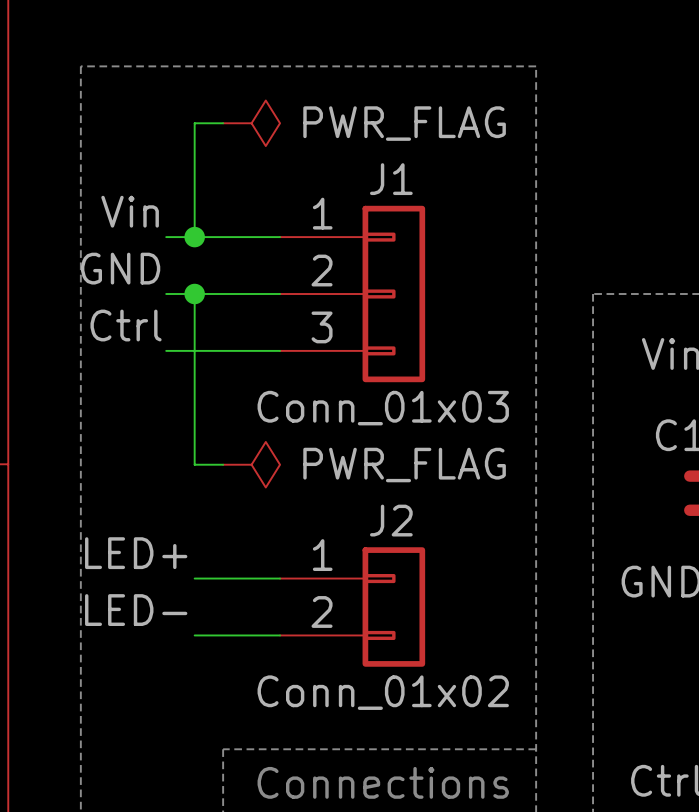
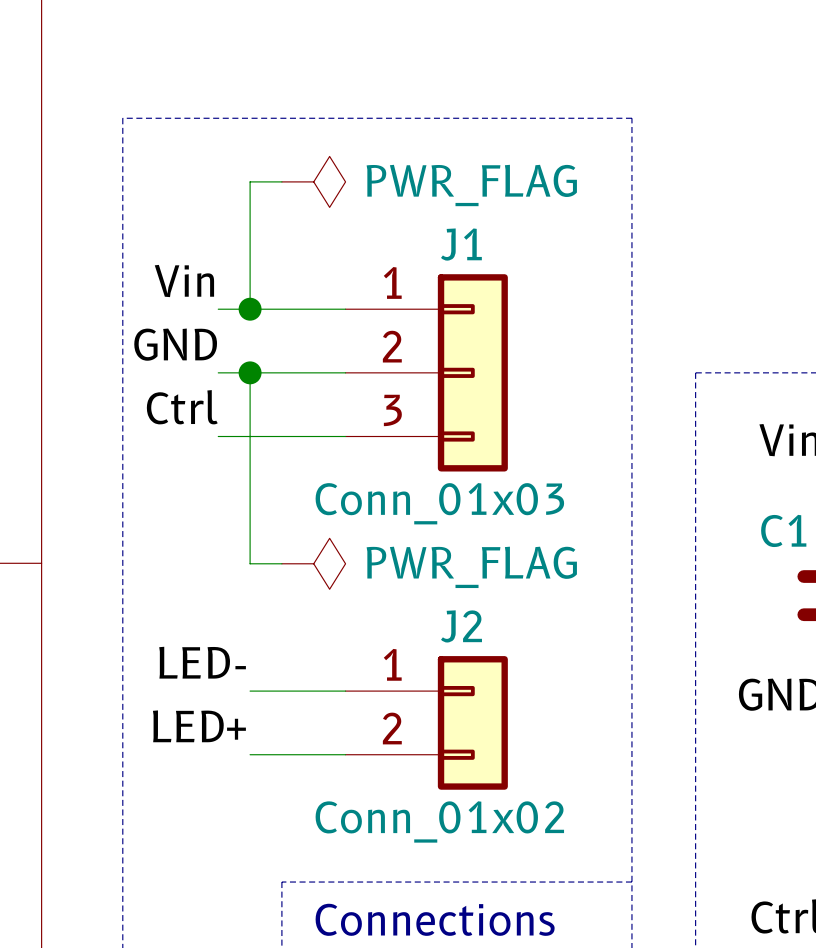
label: LED+ (136, 553) -> LED- (202, 662)
label: LED- (136, 610) -> LED+ (199, 726)

